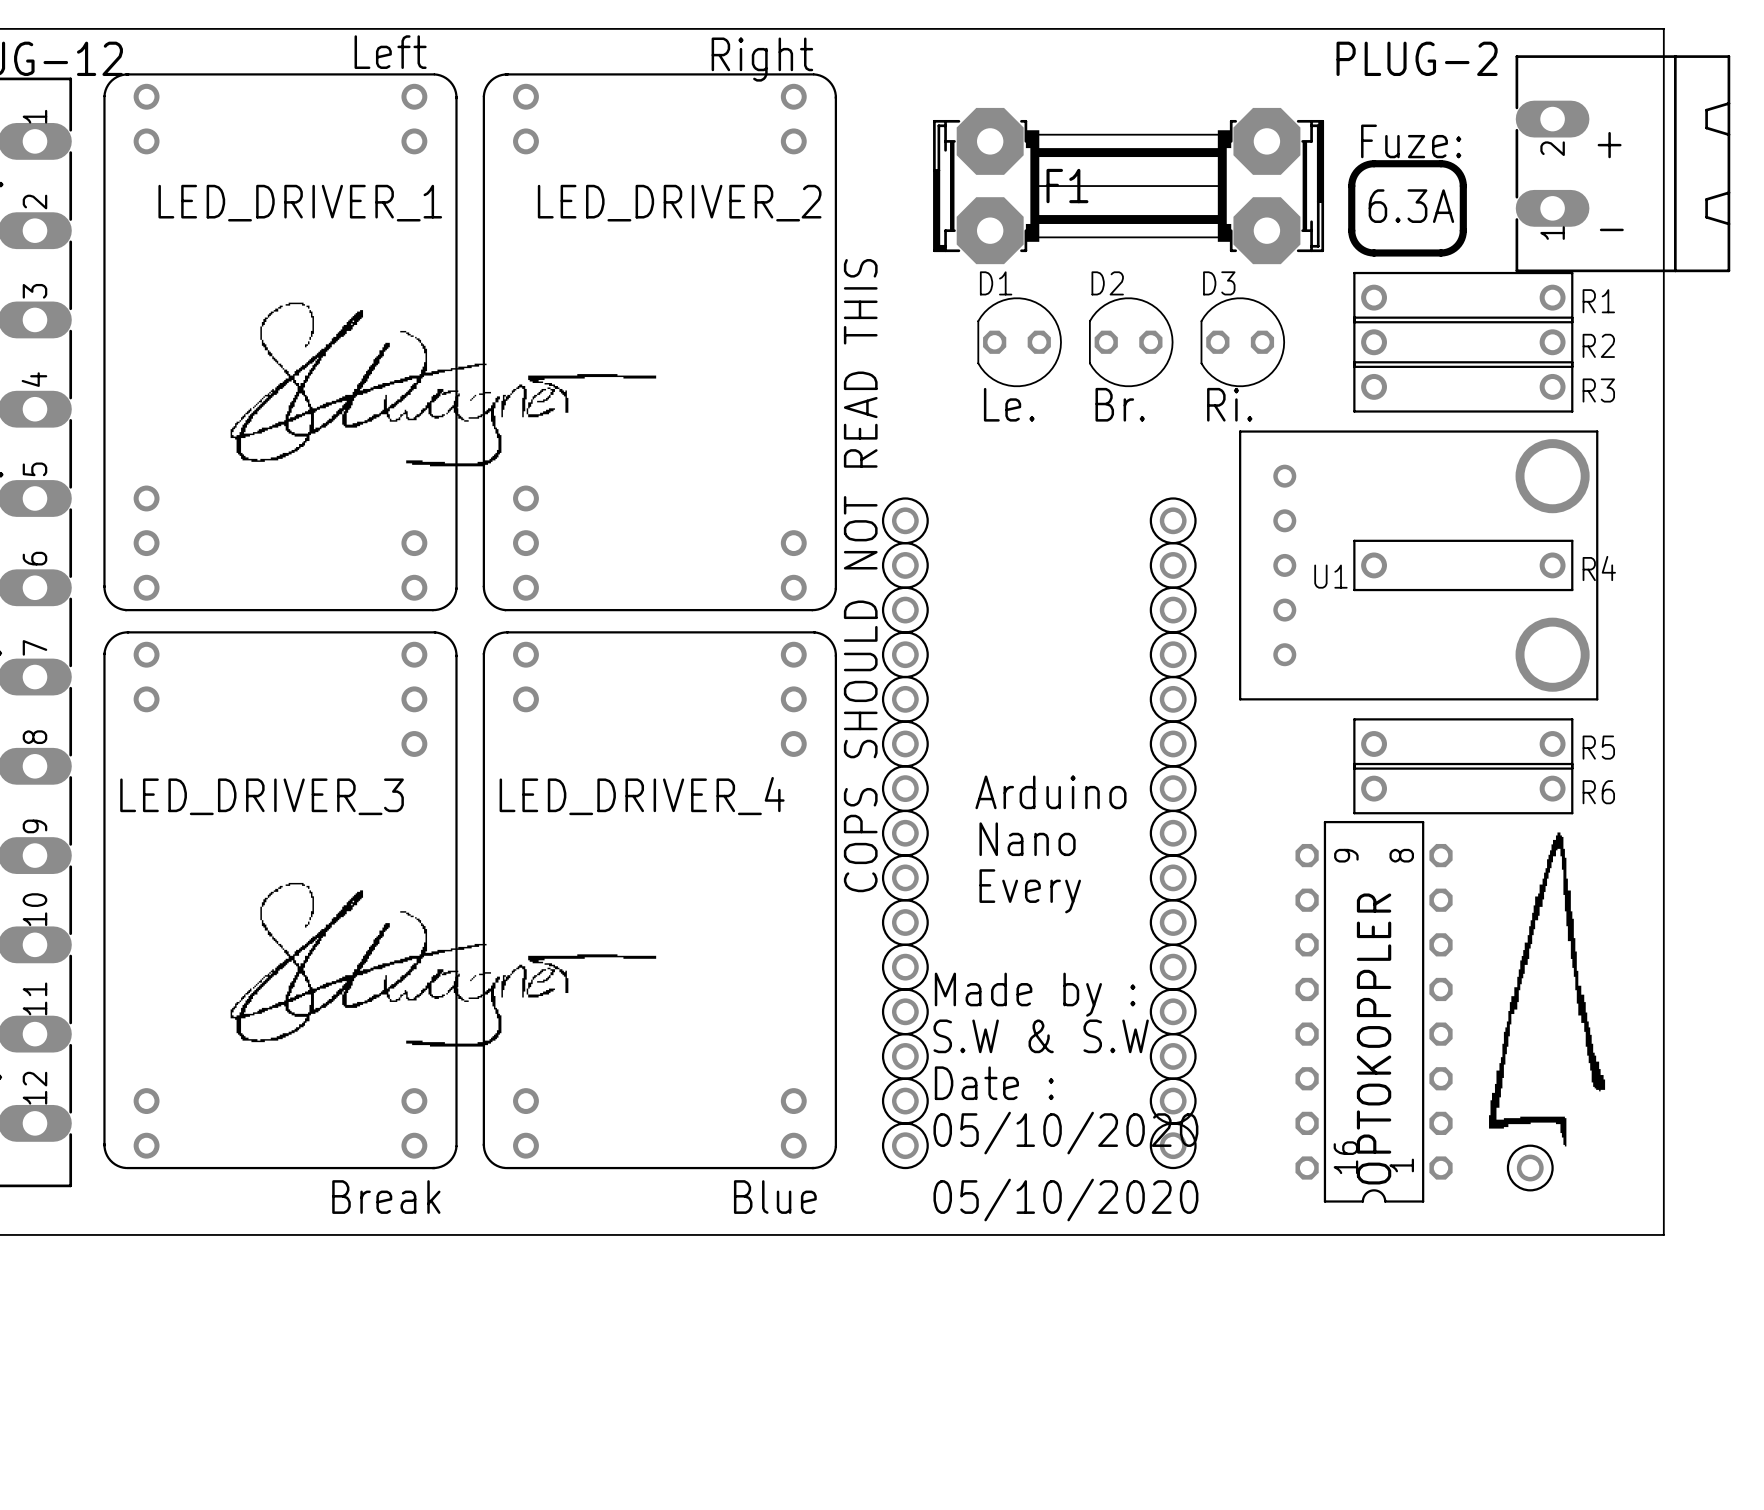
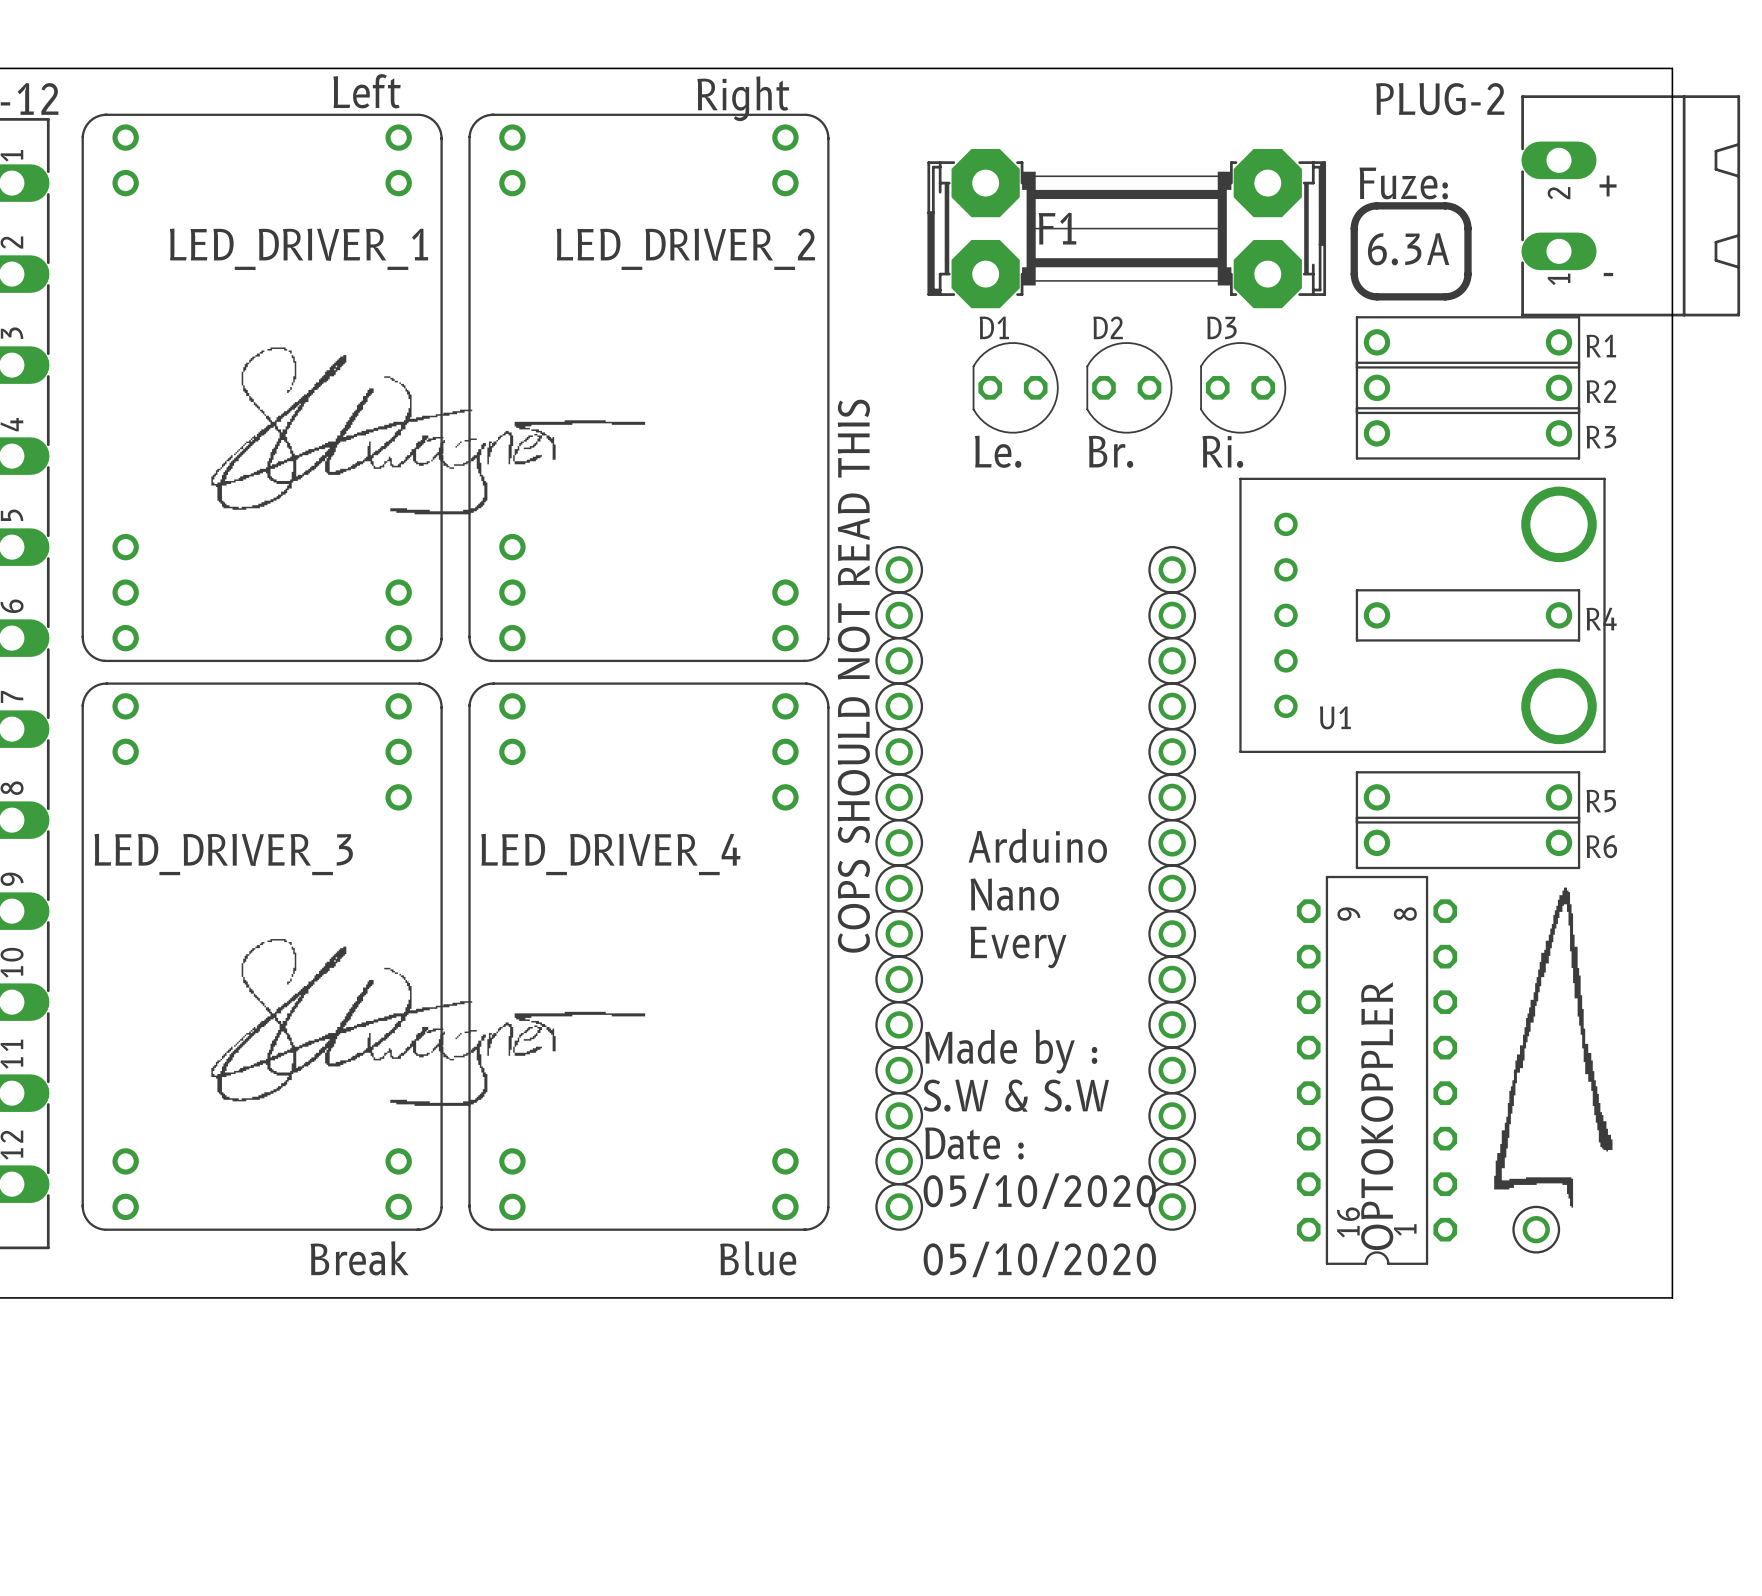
U1 name position: U1 (1330, 576) -> U1 (1335, 717)

